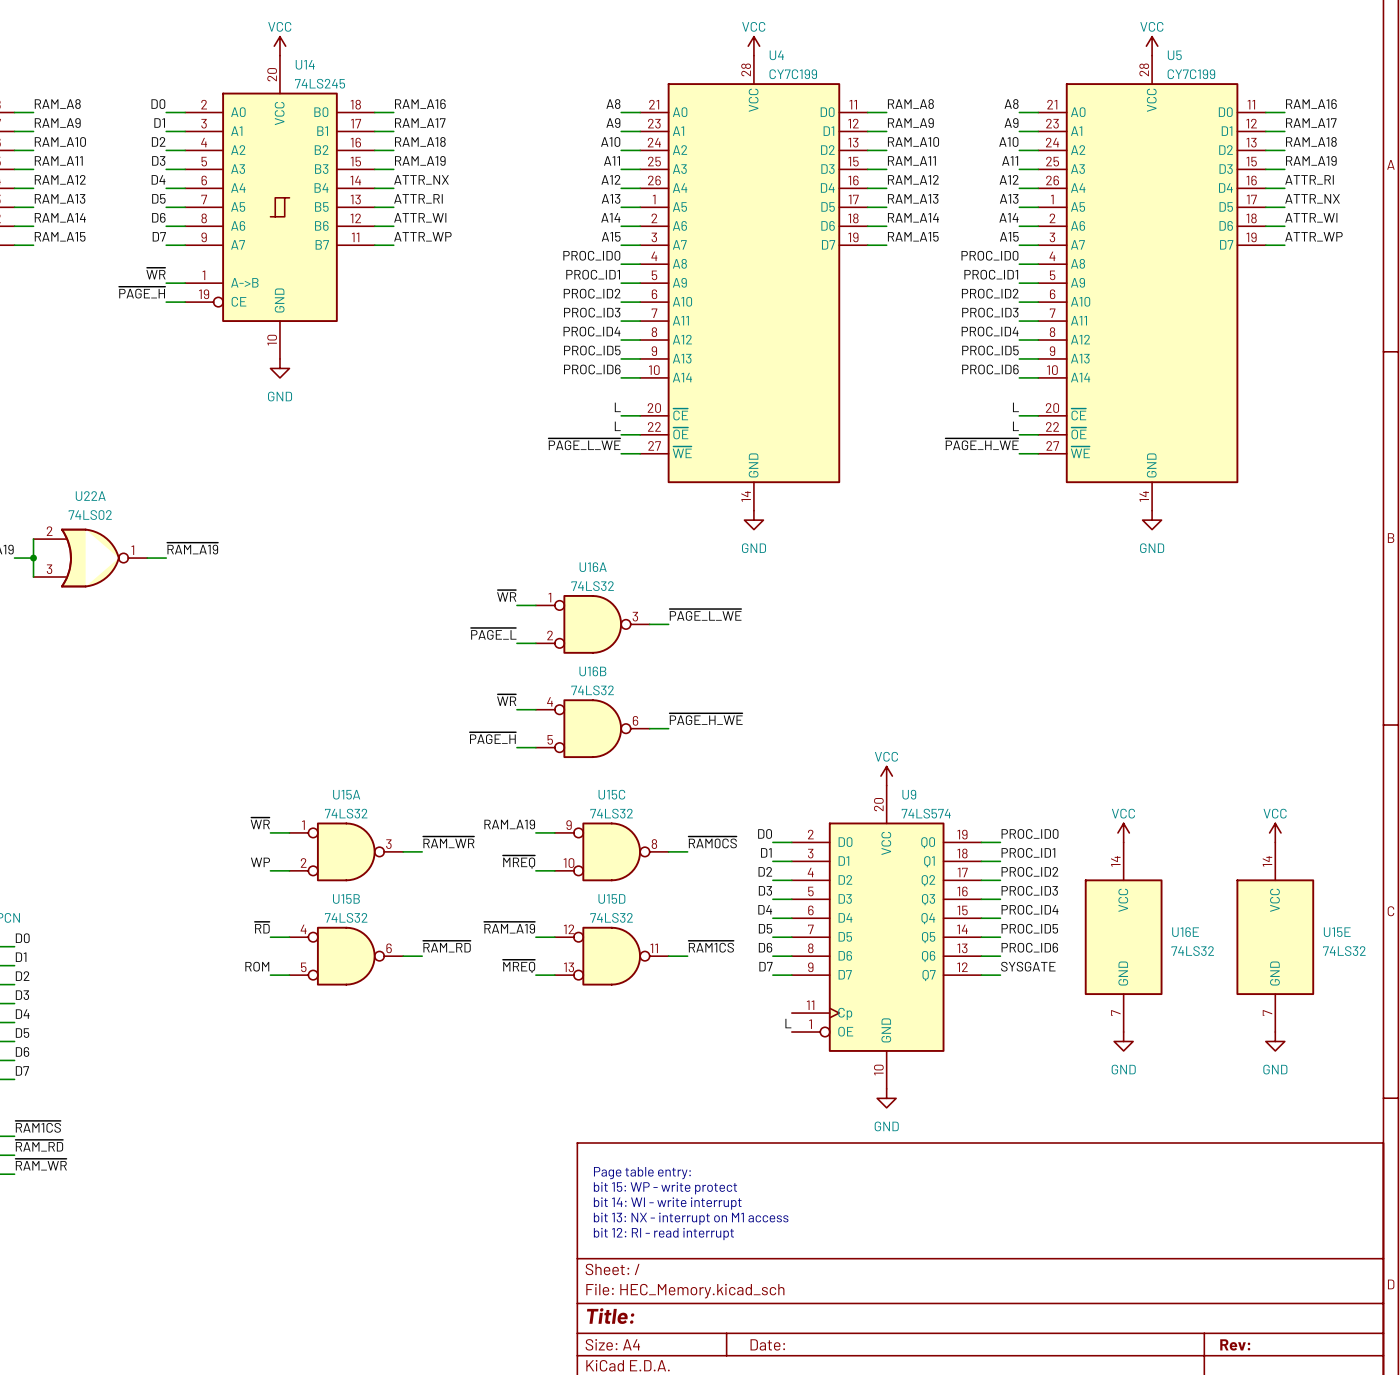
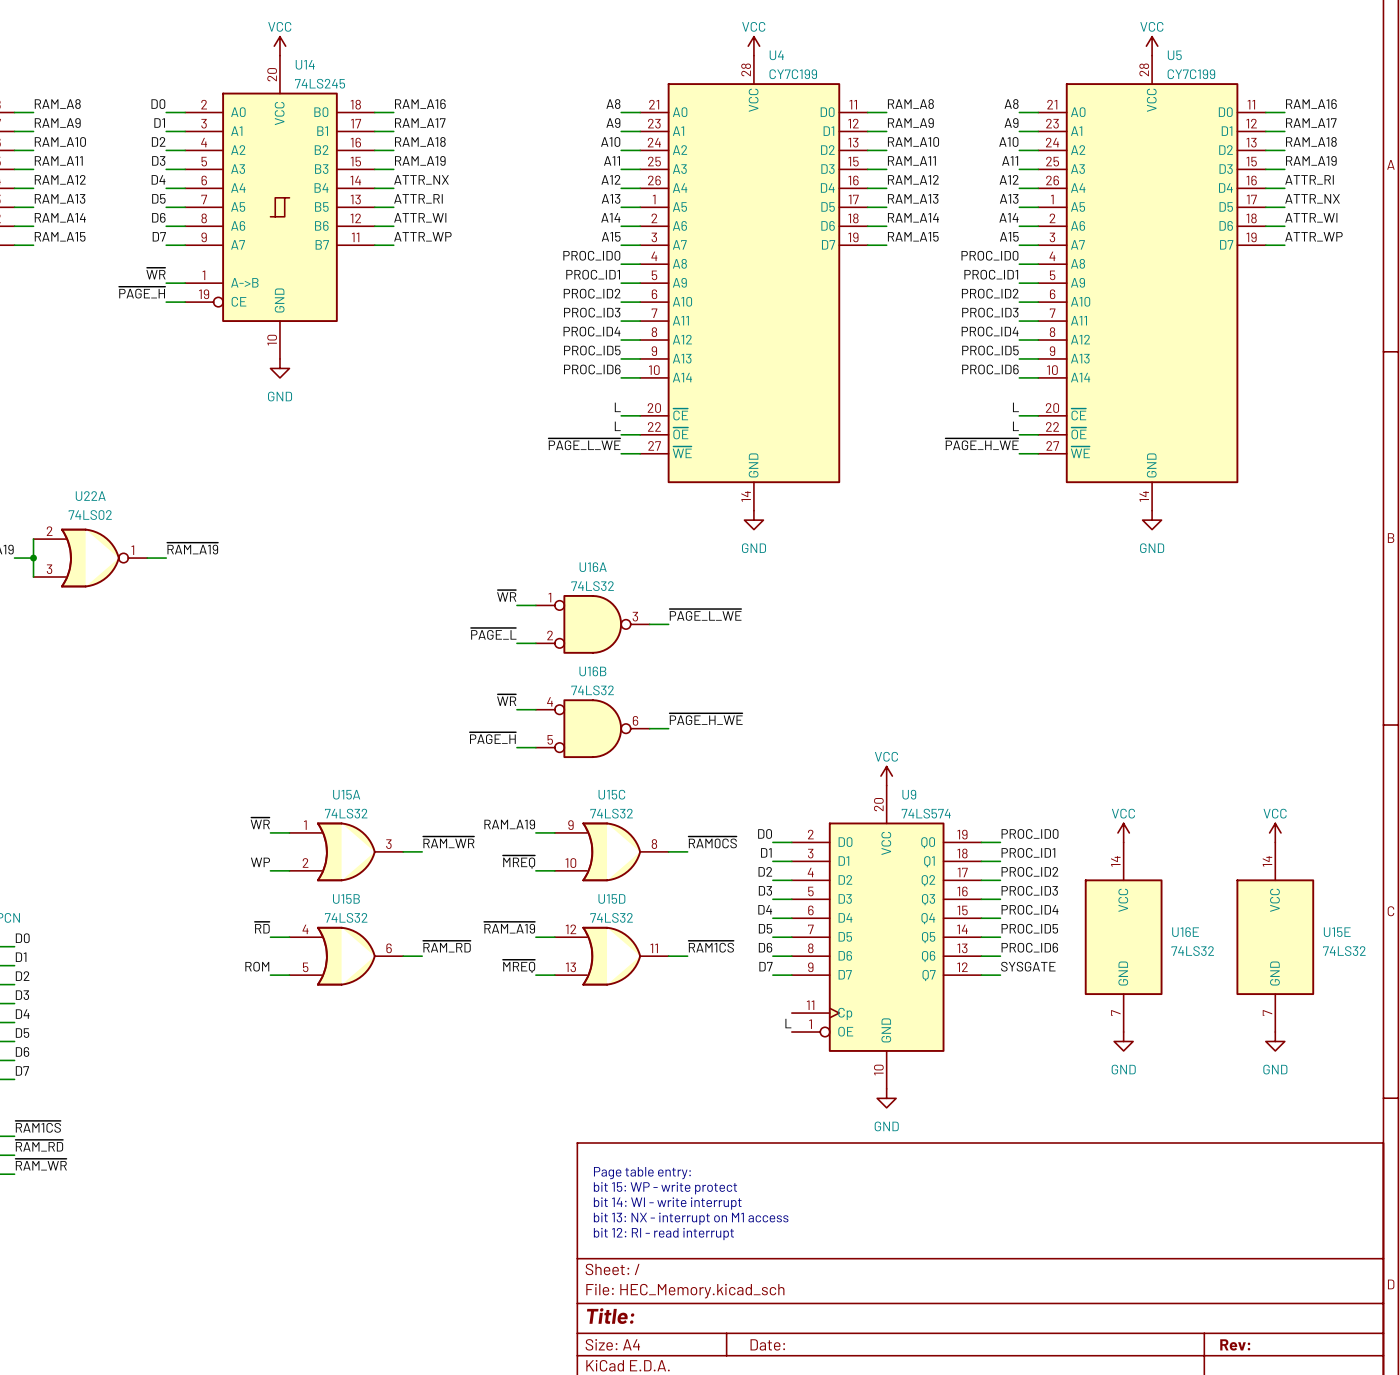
U15A symbol: [289, 822, 404, 882] -> [289, 822, 404, 882]
U15C symbol: [554, 822, 669, 882] -> [554, 822, 669, 882]
U15B symbol: [289, 926, 404, 986] -> [289, 926, 404, 986]
U15D symbol: [554, 926, 669, 986] -> [554, 926, 669, 986]

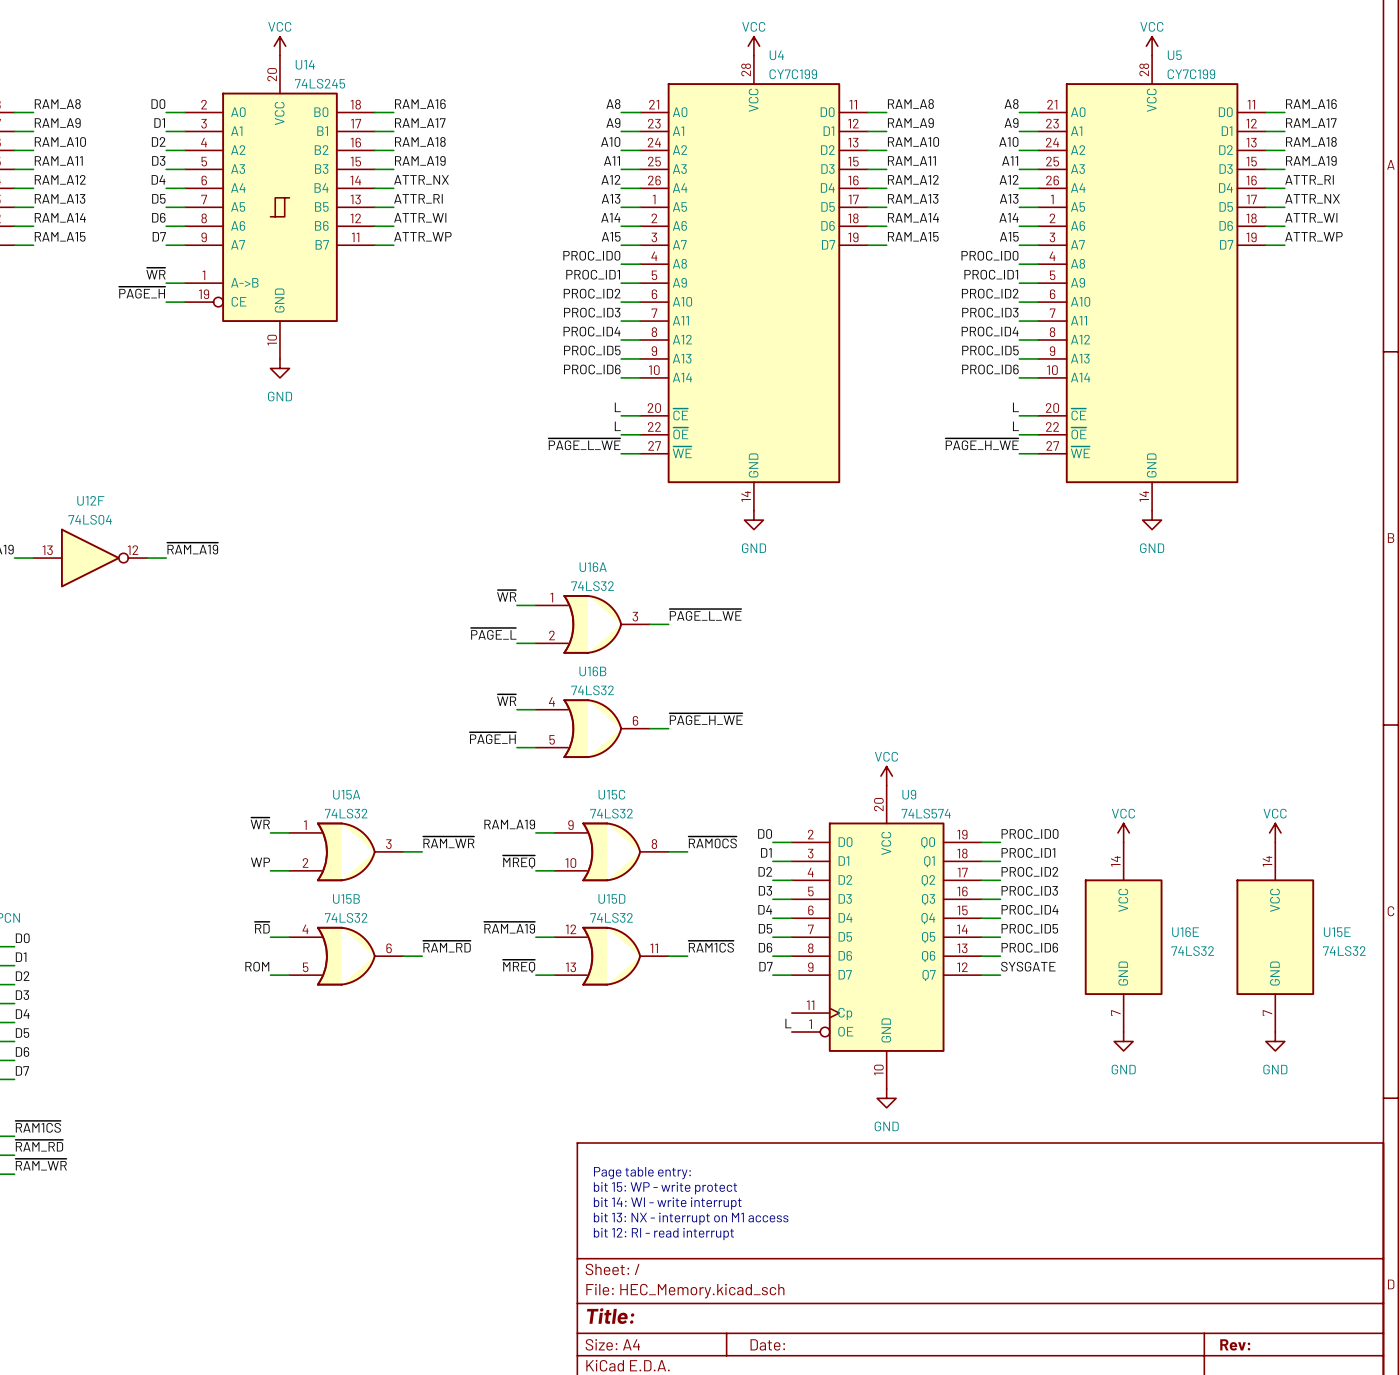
wire: (33, 539) (33, 577) -> none
junction: (33, 558) -> none
U22A: 74LS02 (90, 558) -> none
U12F: none -> 74LS04 (90, 558)
U16A symbol: [535, 595, 650, 654] -> [535, 595, 650, 654]
U16B symbol: [535, 699, 650, 759] -> [535, 699, 650, 759]

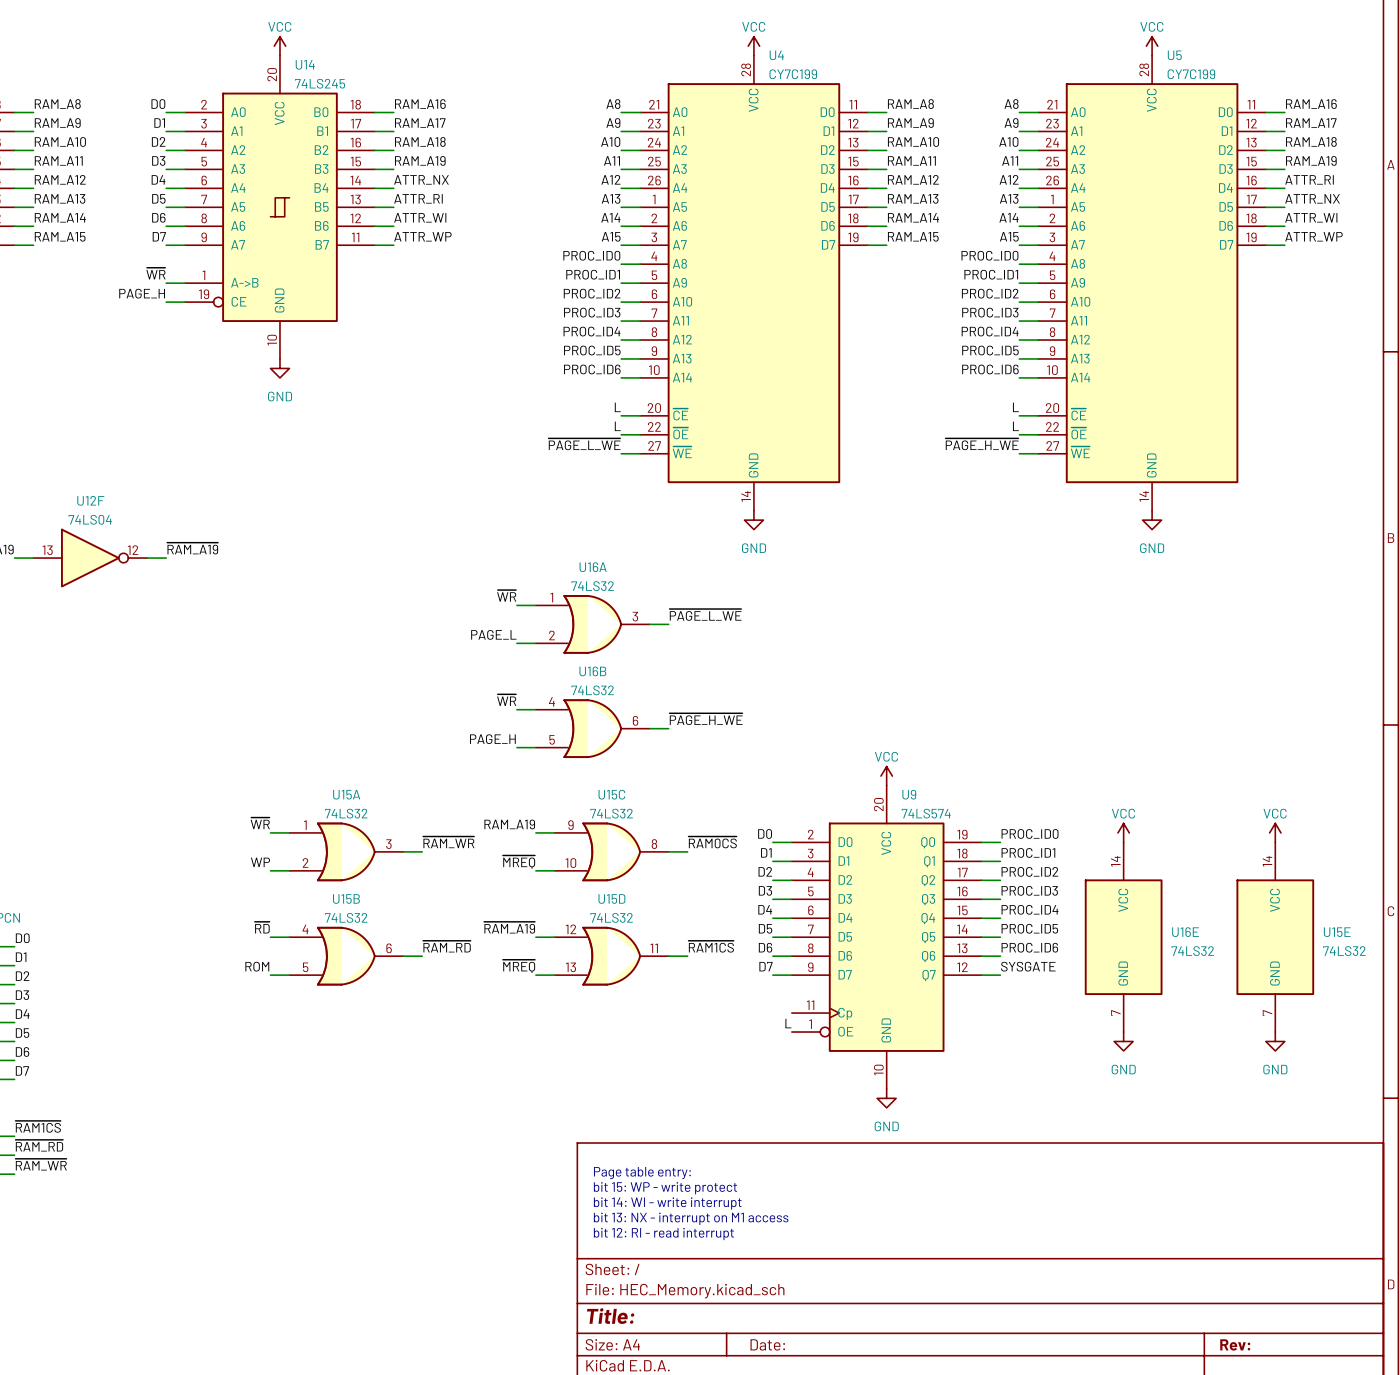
label: ~{PAGE_H} (142, 292) -> PAGE_H (142, 293)
label: ~{PAGE_L} (493, 633) -> PAGE_L (493, 634)
label: ~{PAGE_H} (492, 738) -> PAGE_H (492, 739)

